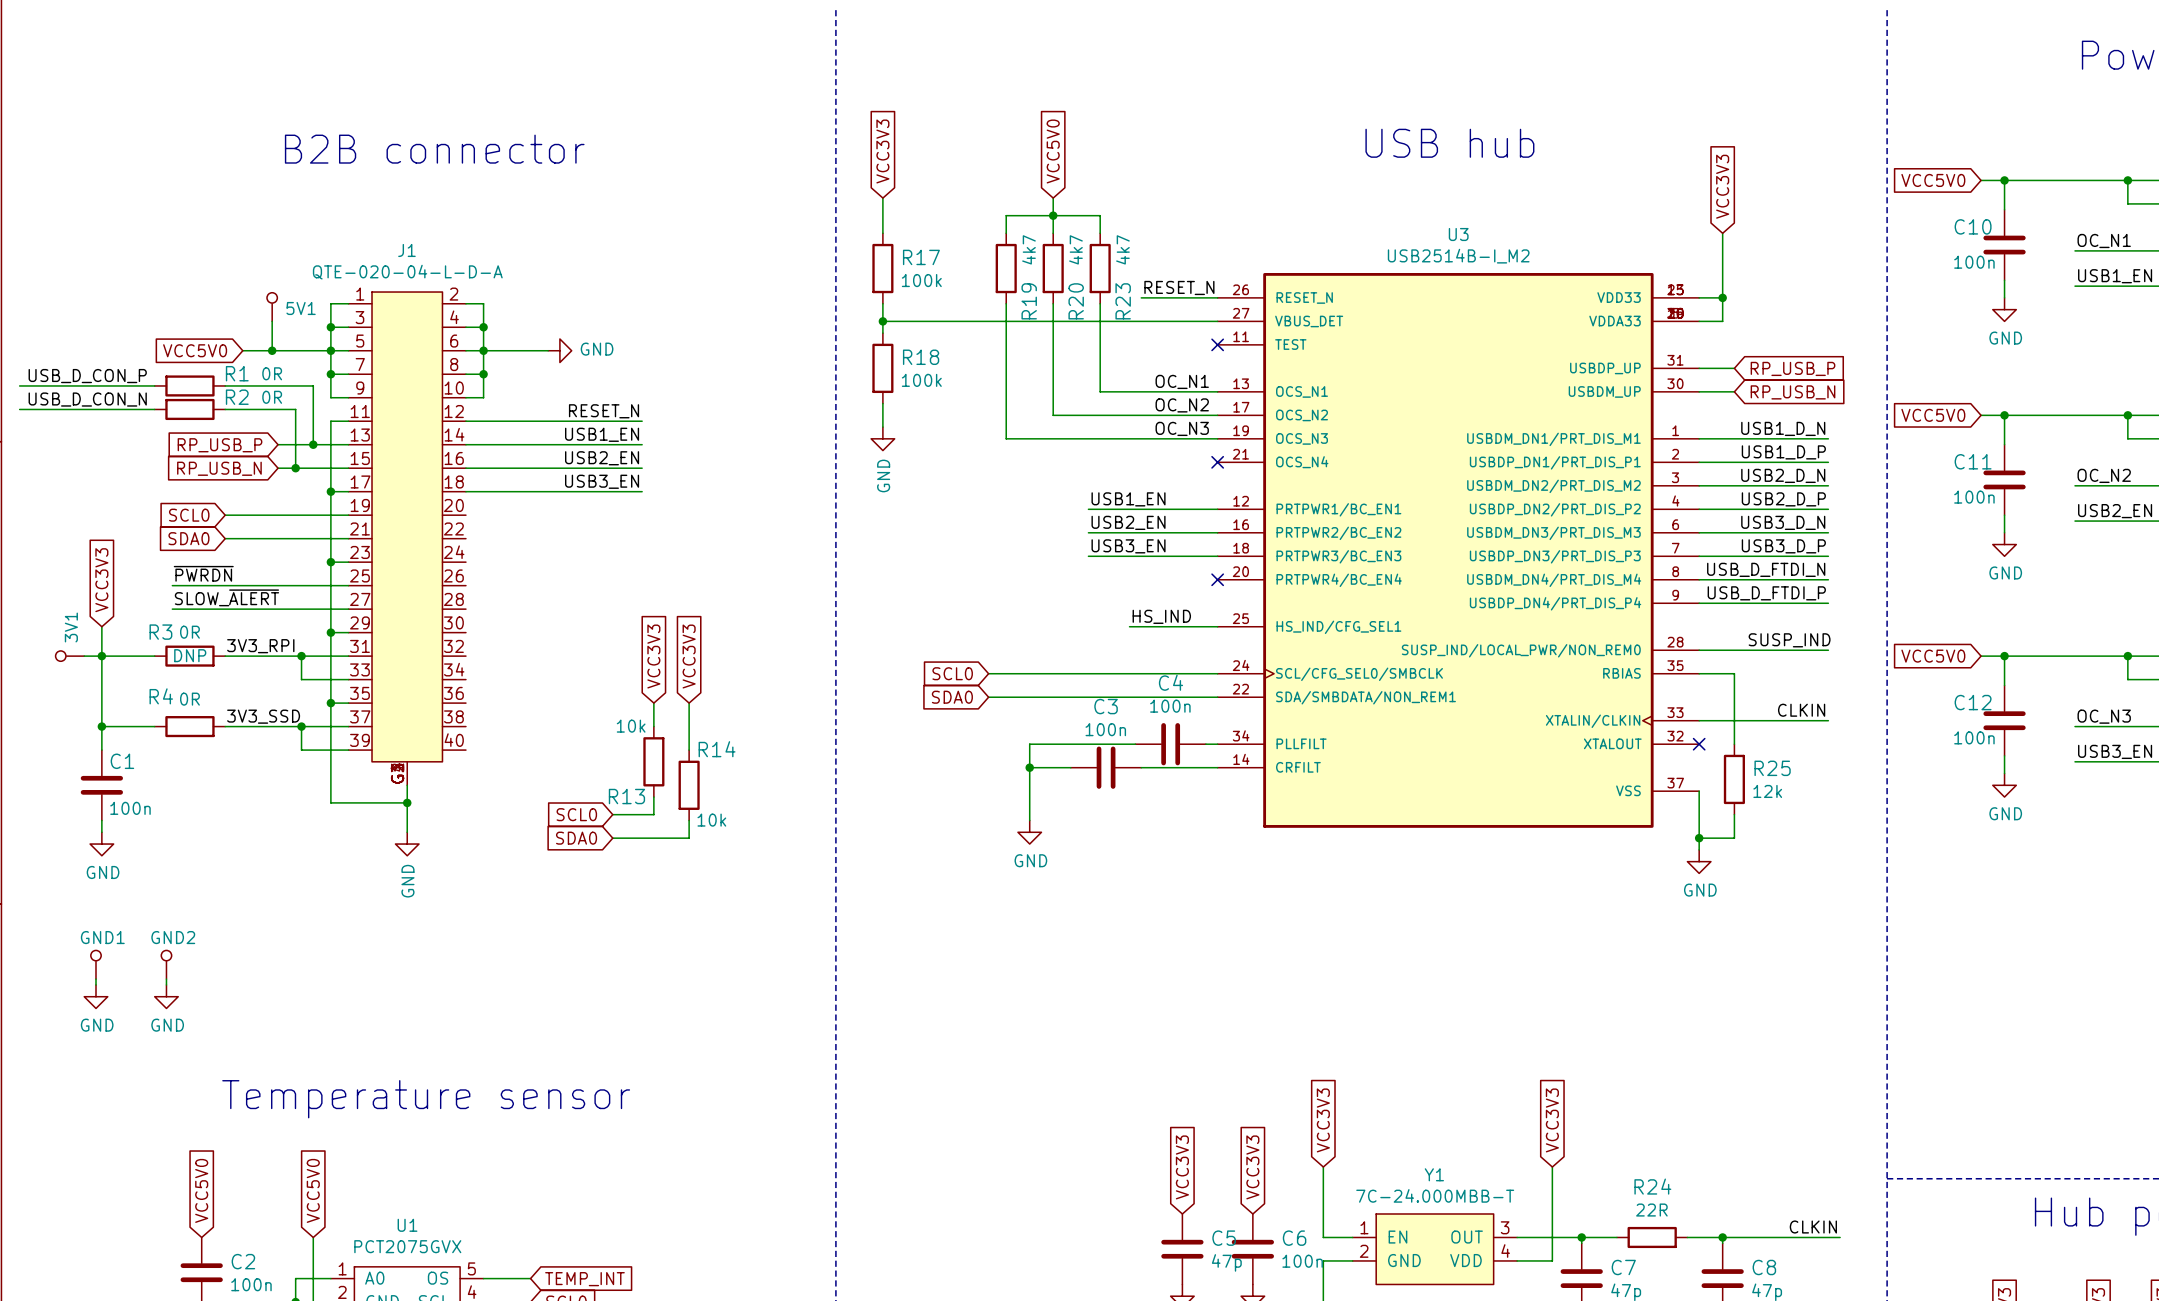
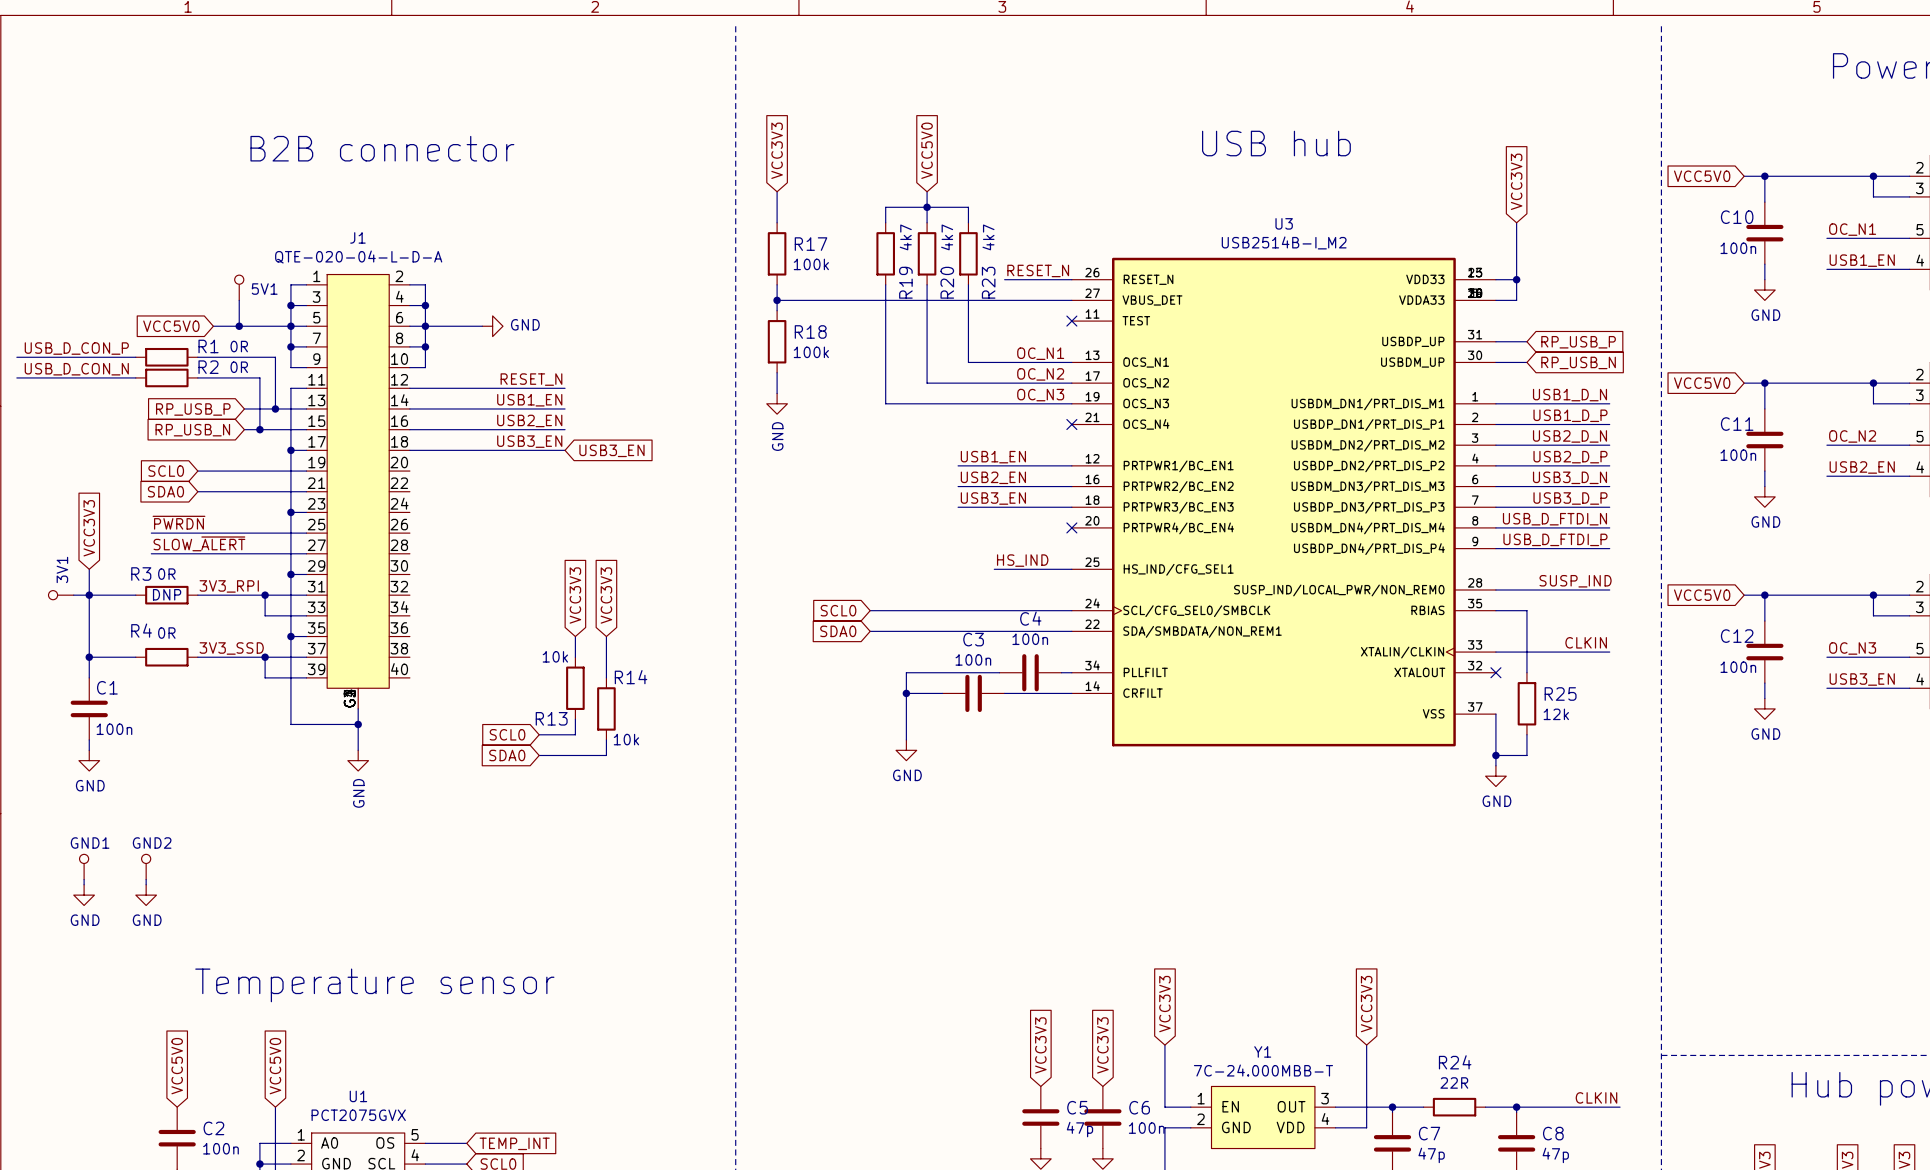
global label: none -> USB3_EN (611, 450)

